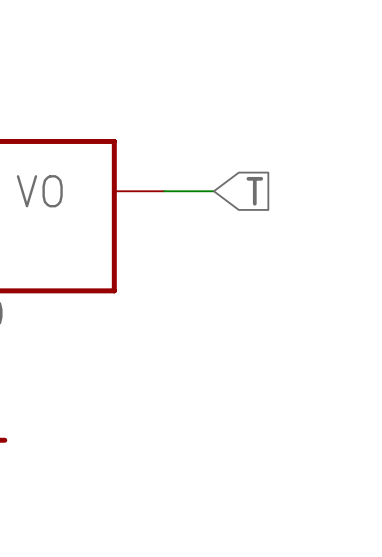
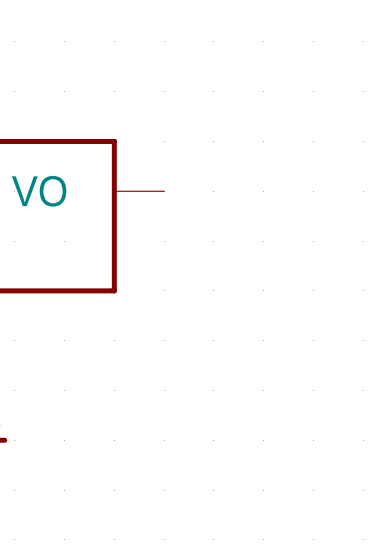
wire: (164, 191) (213, 191) -> none
global label: T (254, 191) -> none

